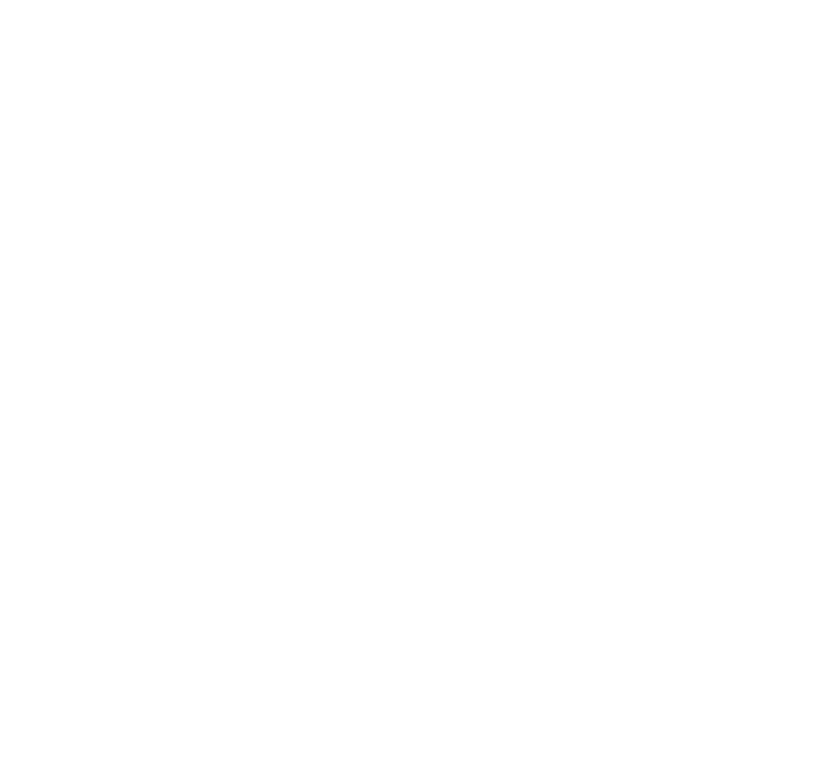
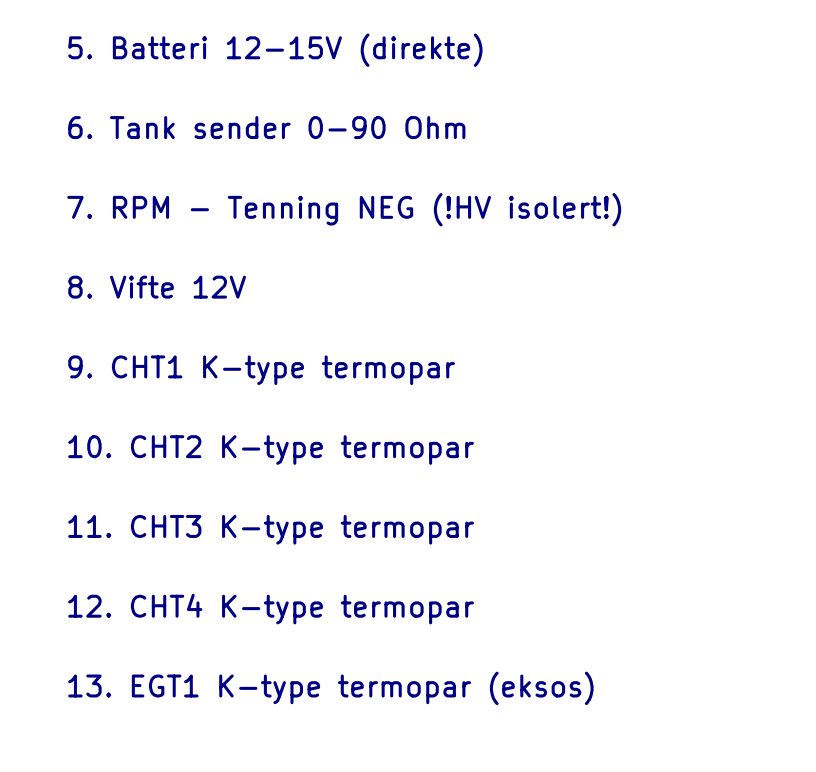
text: none -> 5. Batteri 12-15V (direkte) (275, 50)
text: none -> 6. Tank sender 0-90 Ohm (266, 127)
text: none -> 7. RPM - Tenning NEG (!HV isolert!) (344, 209)
text: none -> 8. Vifte 12V (157, 287)
text: none -> 9. CHT1 K-type termopar (261, 370)
text: none -> 10. CHT2 K-type termopar (271, 450)
text: none -> 11. CHT3 K-type termopar (271, 529)
text: none -> 12. CHT4 K-type termopar (271, 609)
text: none -> 13. EGT1 K-type termopar (eksos) (330, 688)

